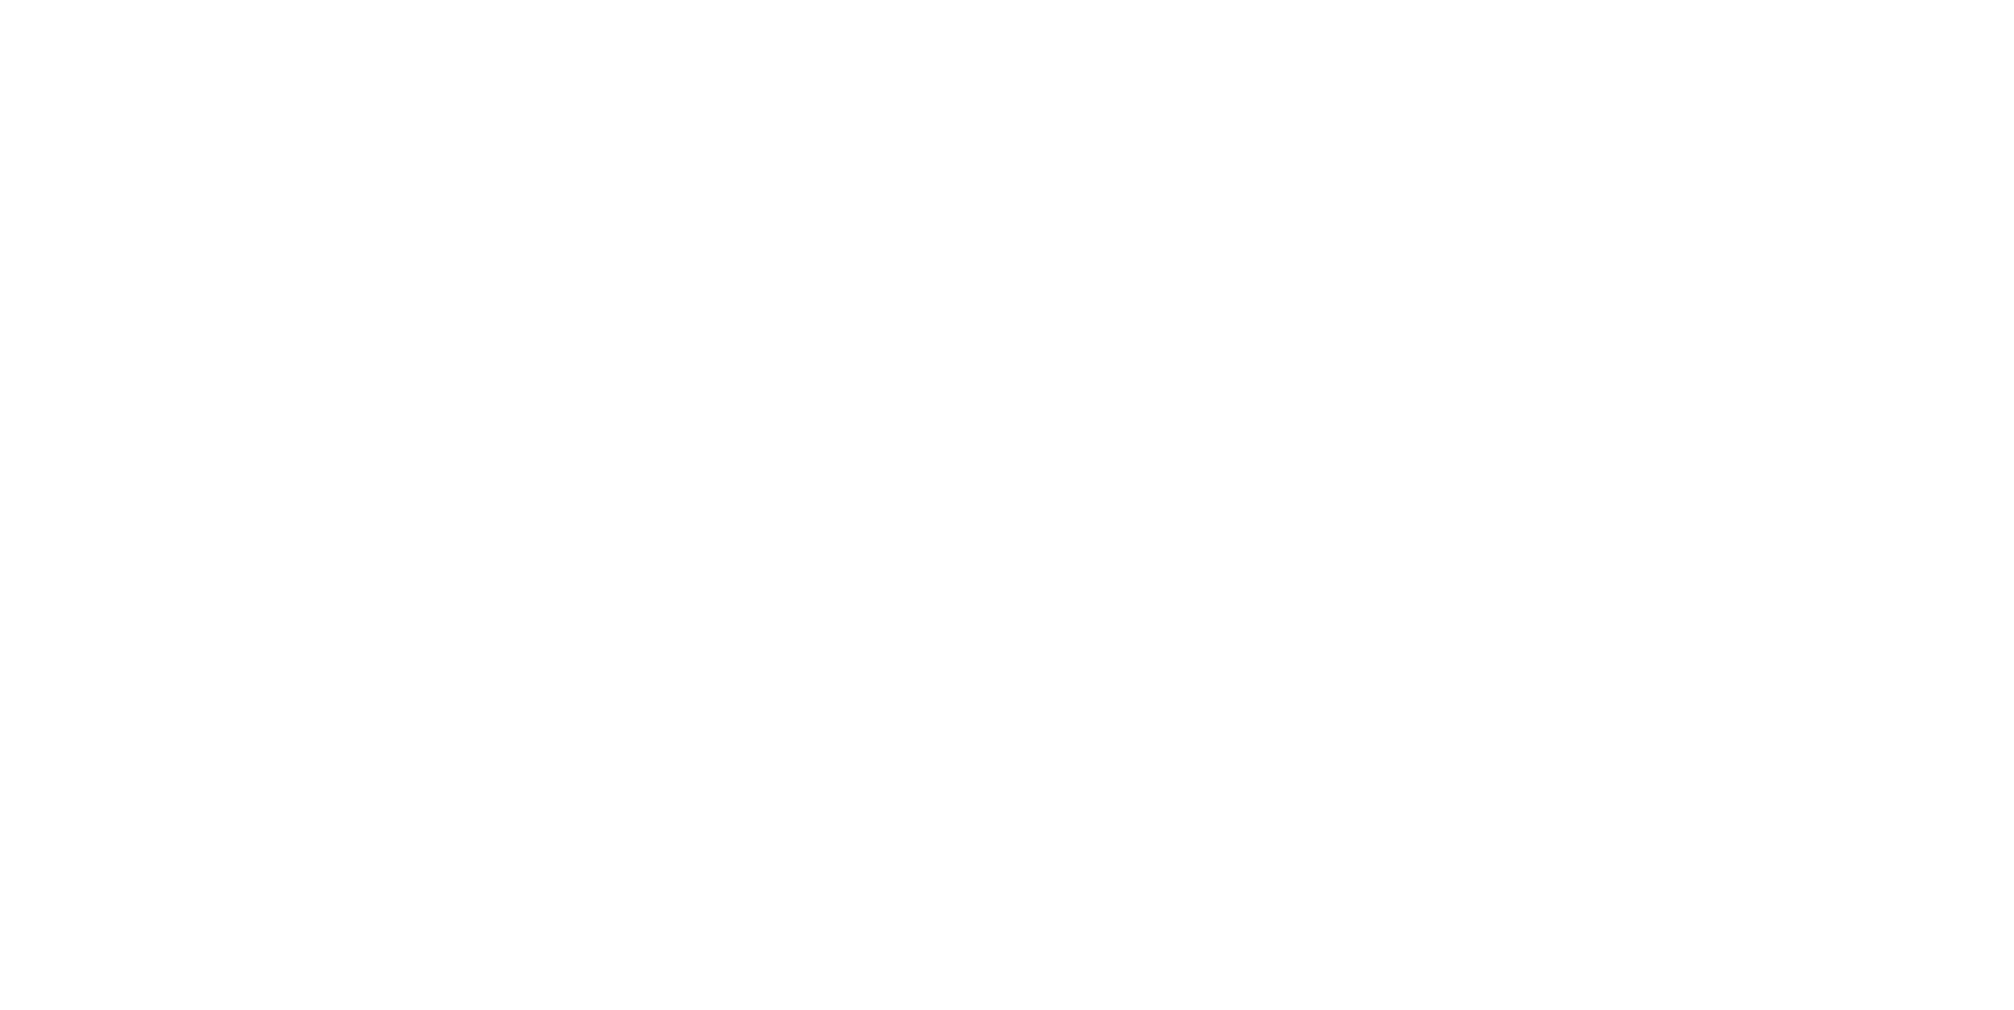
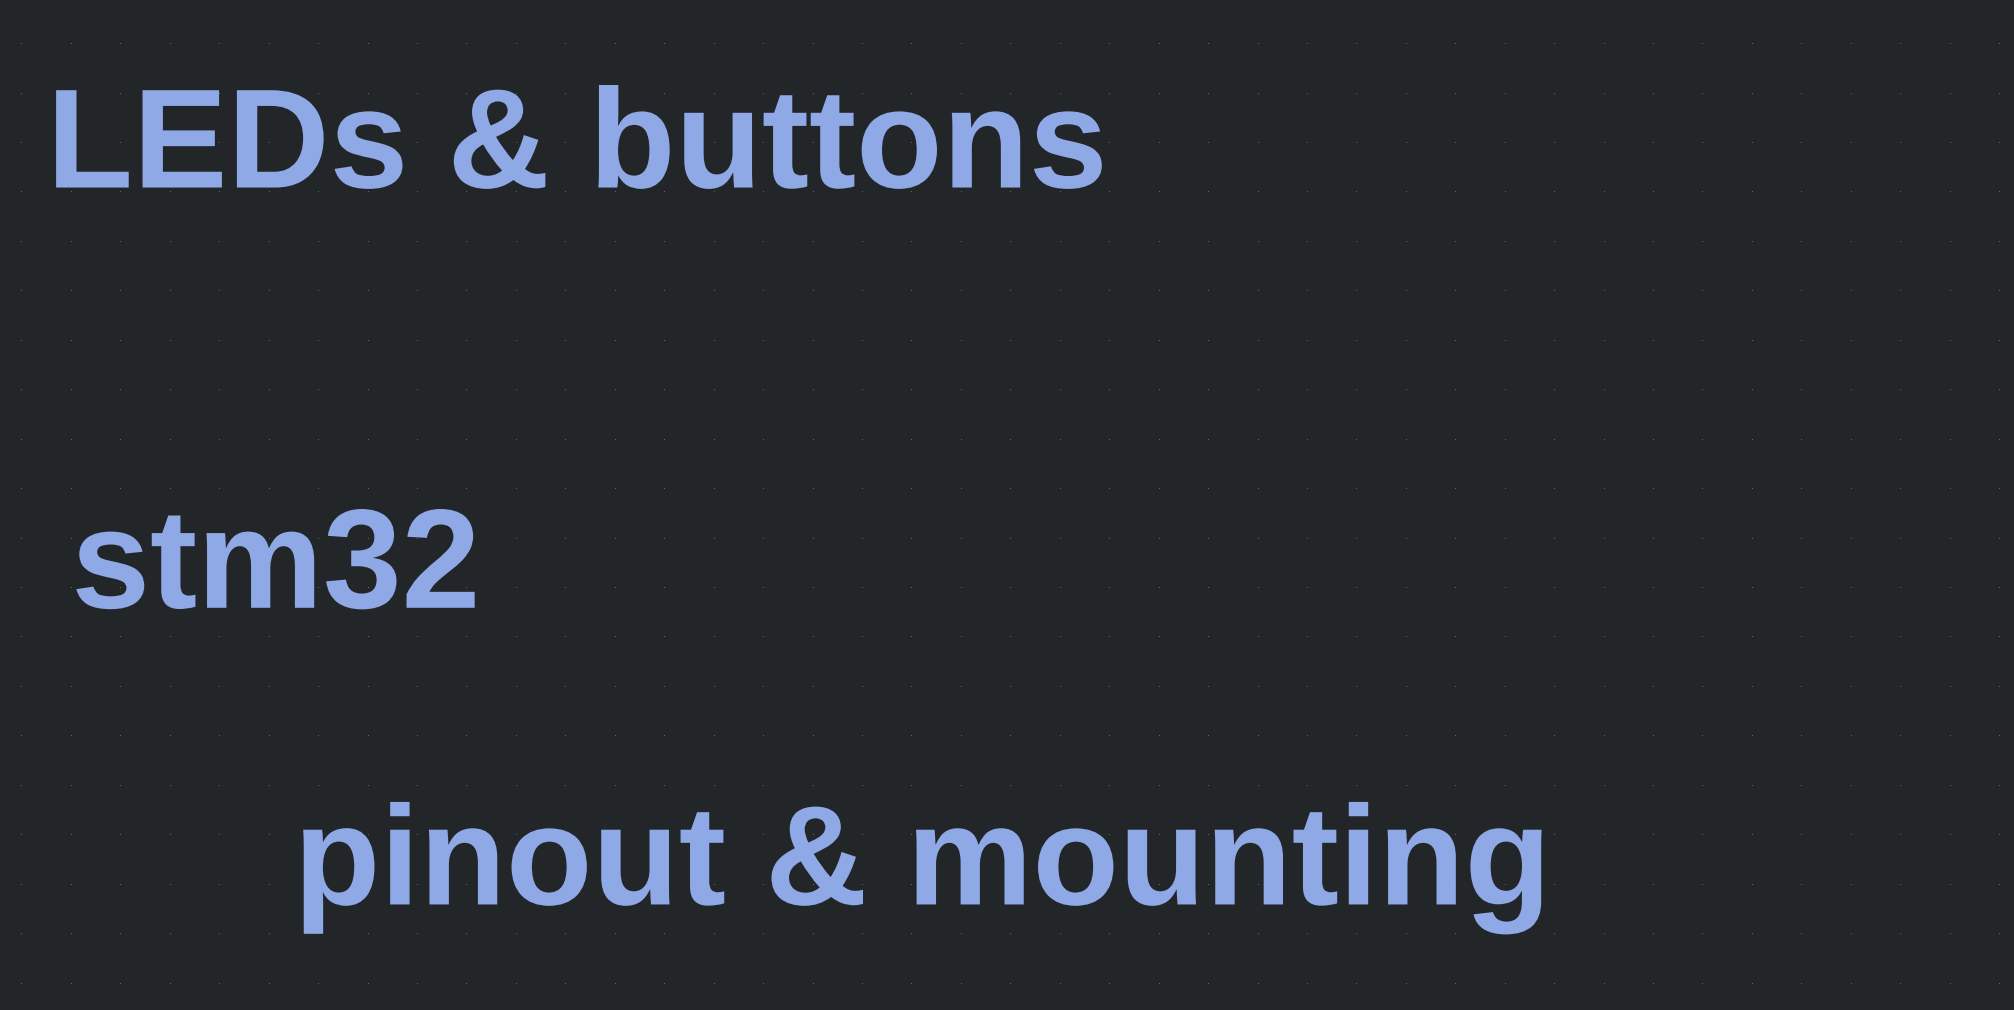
text: none -> LEDs & buttons (578, 136)
text: none -> stm32 (275, 559)
text: none -> pinout & mounting (922, 868)

